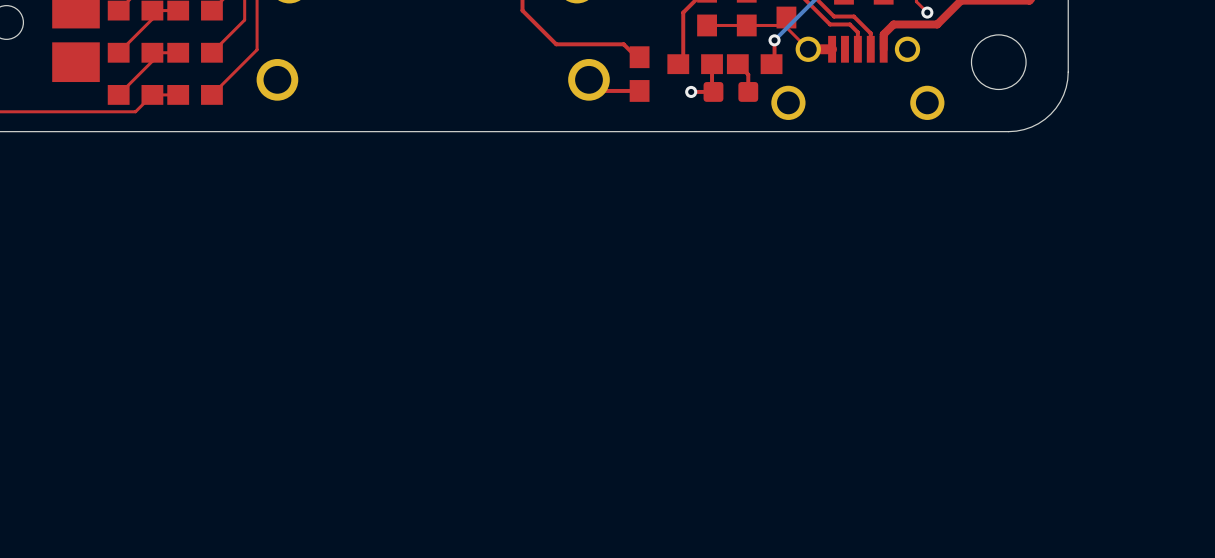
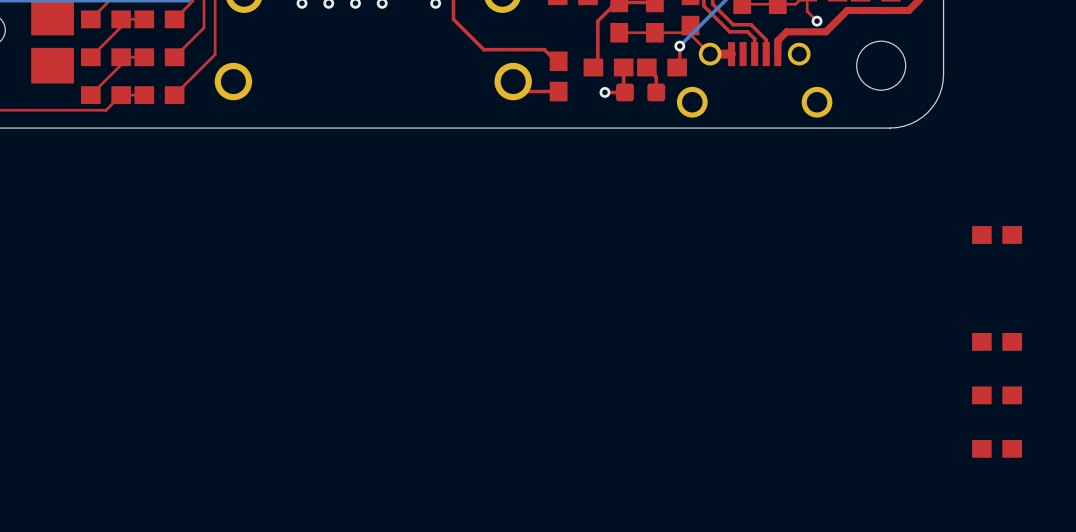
part: none -> (997, 234)
part: none -> (997, 341)
part: none -> (997, 395)
part: none -> (997, 448)

